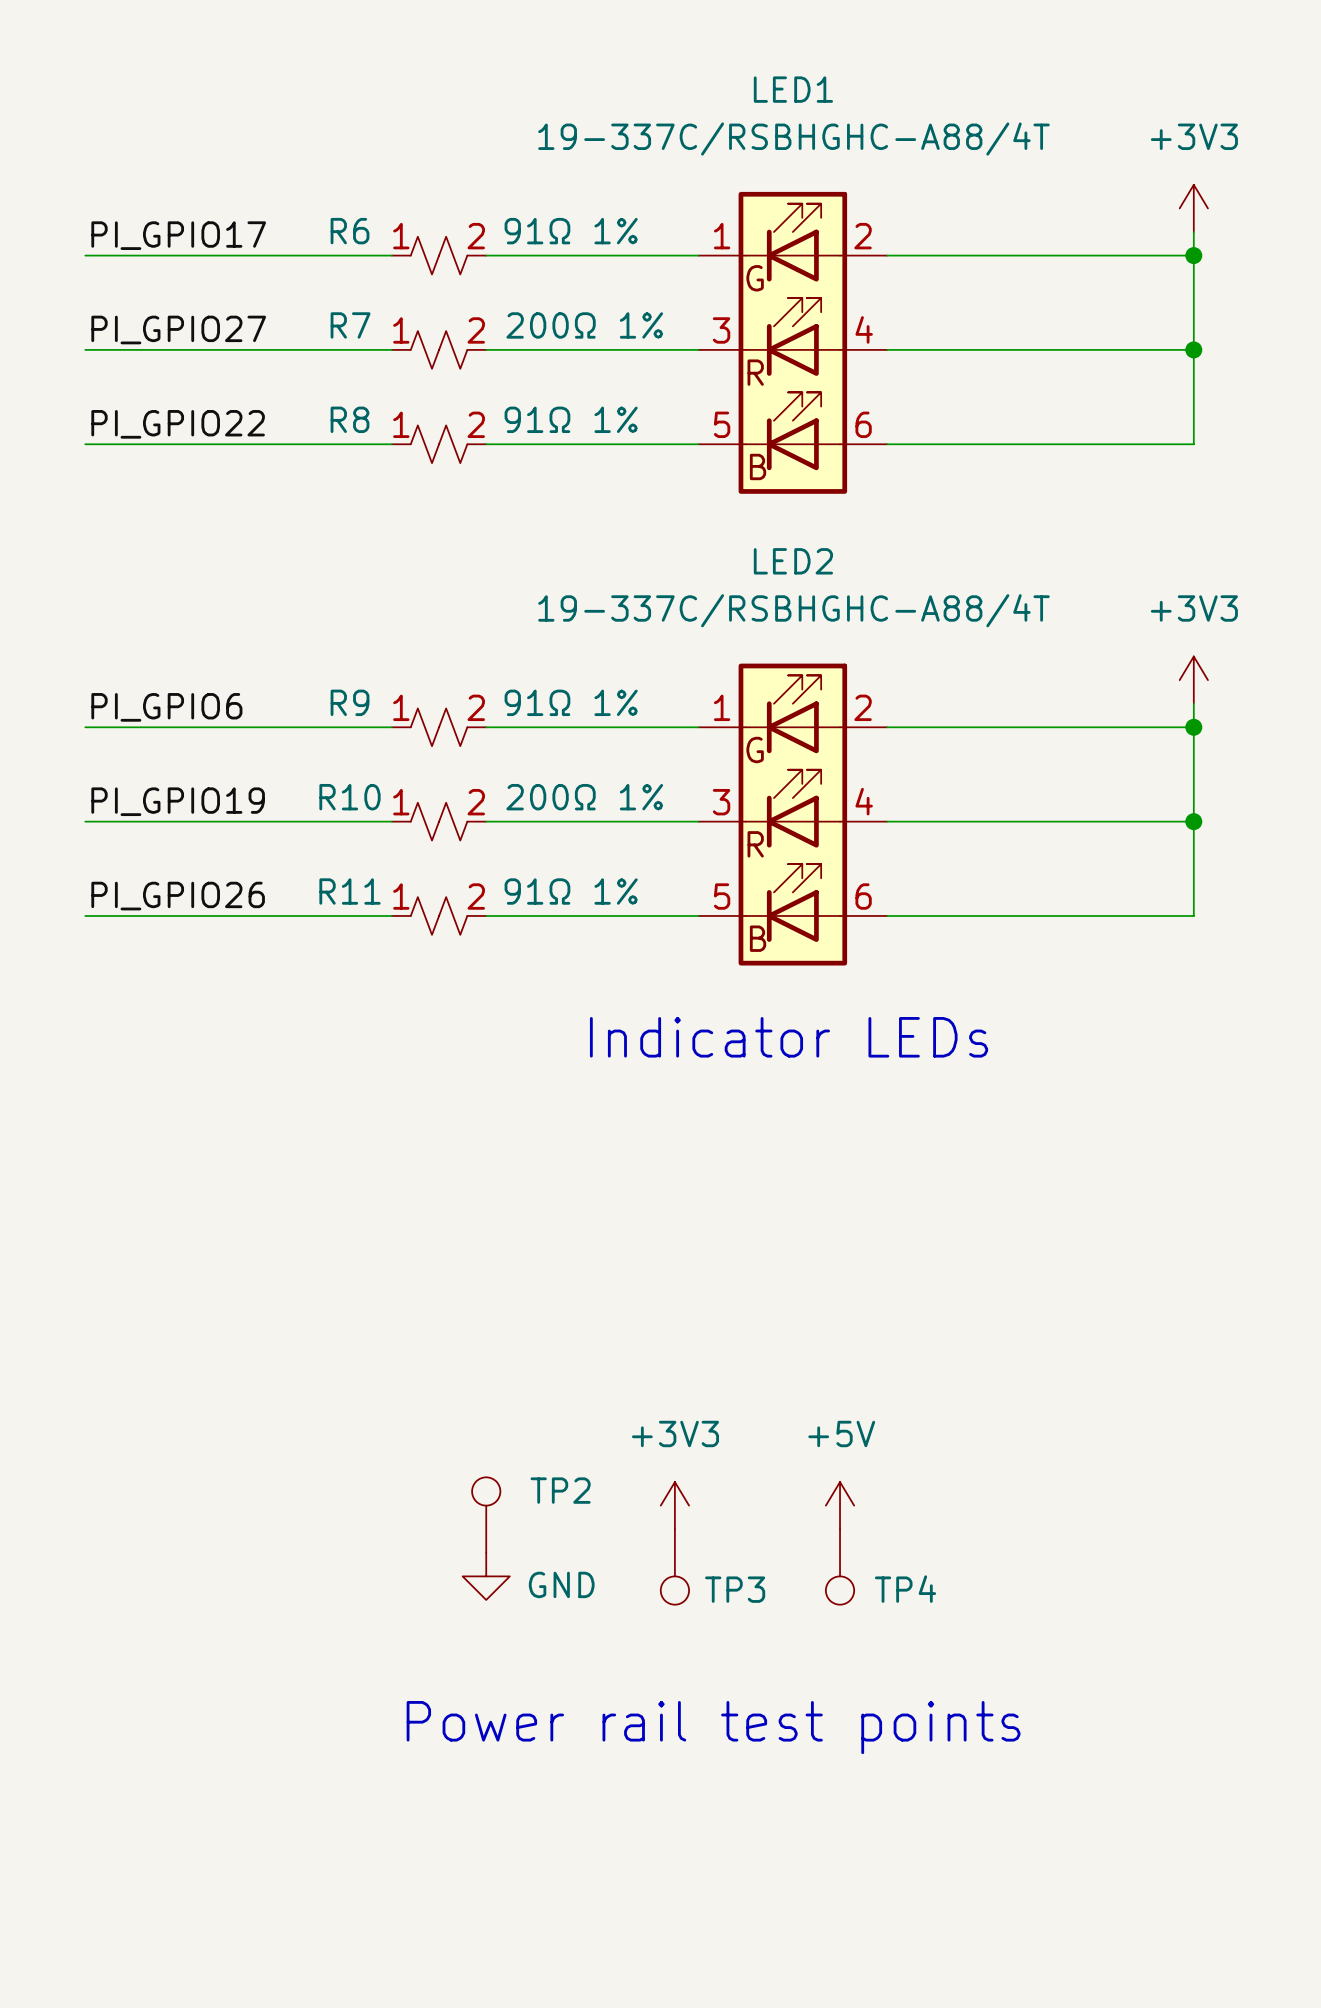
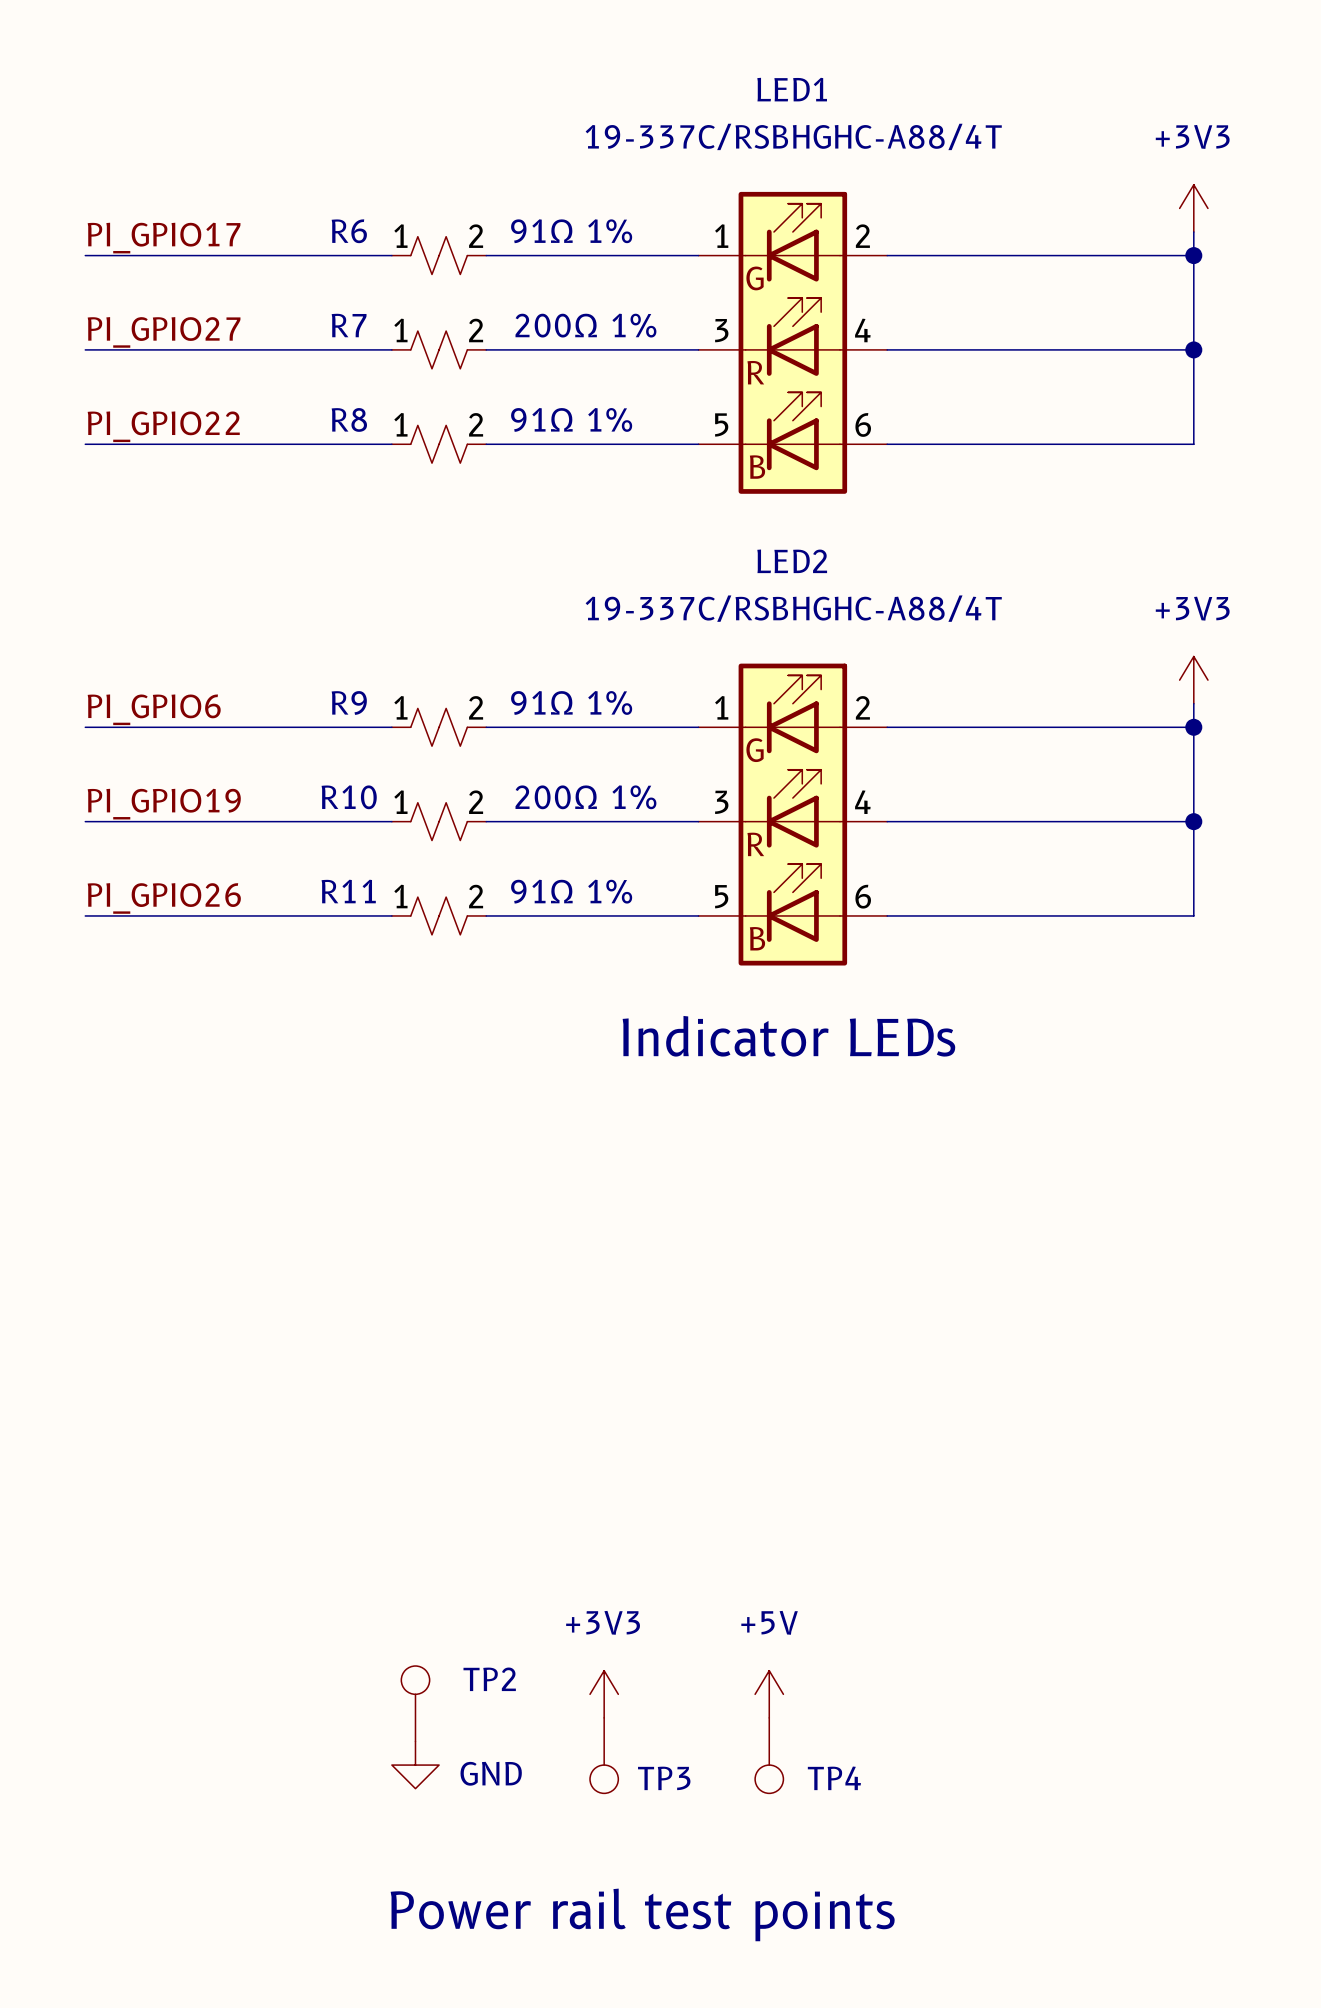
power symbol position: +3V3 (674, 1505) -> +3V3 (604, 1694)
power symbol position: +5V (840, 1505) -> +5V (769, 1694)
TP2 position: (486, 1515) -> (415, 1703)
TP3 position: (674, 1566) -> (604, 1755)
TP4 position: (840, 1566) -> (769, 1755)
power symbol position: GND (486, 1576) -> GND (415, 1765)
text position: Power rail test points (713, 1727) -> Power rail test points (642, 1914)

